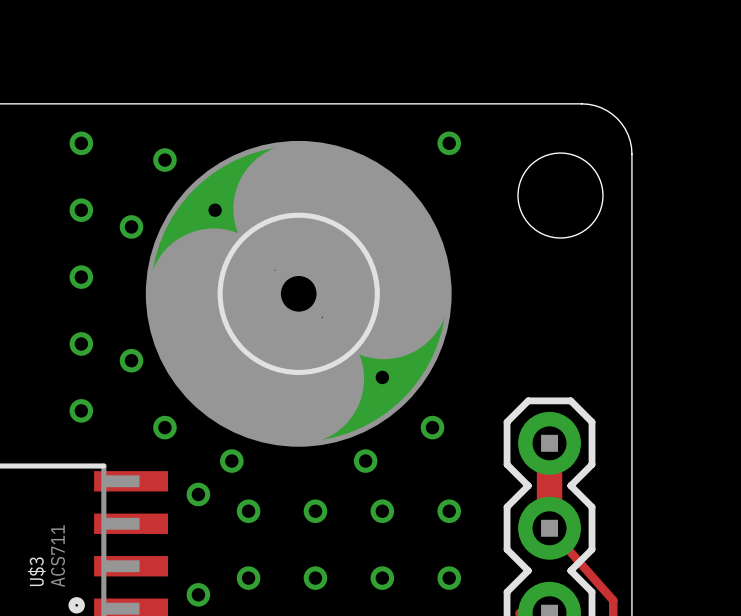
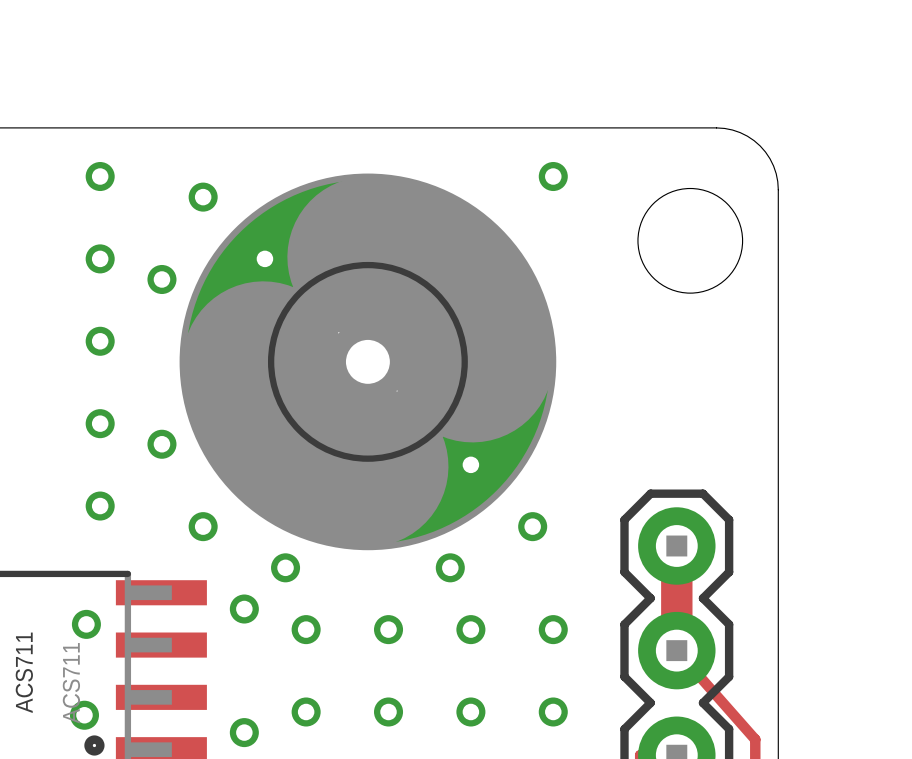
via: none -> (86, 624)
U$3 name: U$3 (36, 571) -> ACS711 (24, 672)
via: none -> (84, 715)

